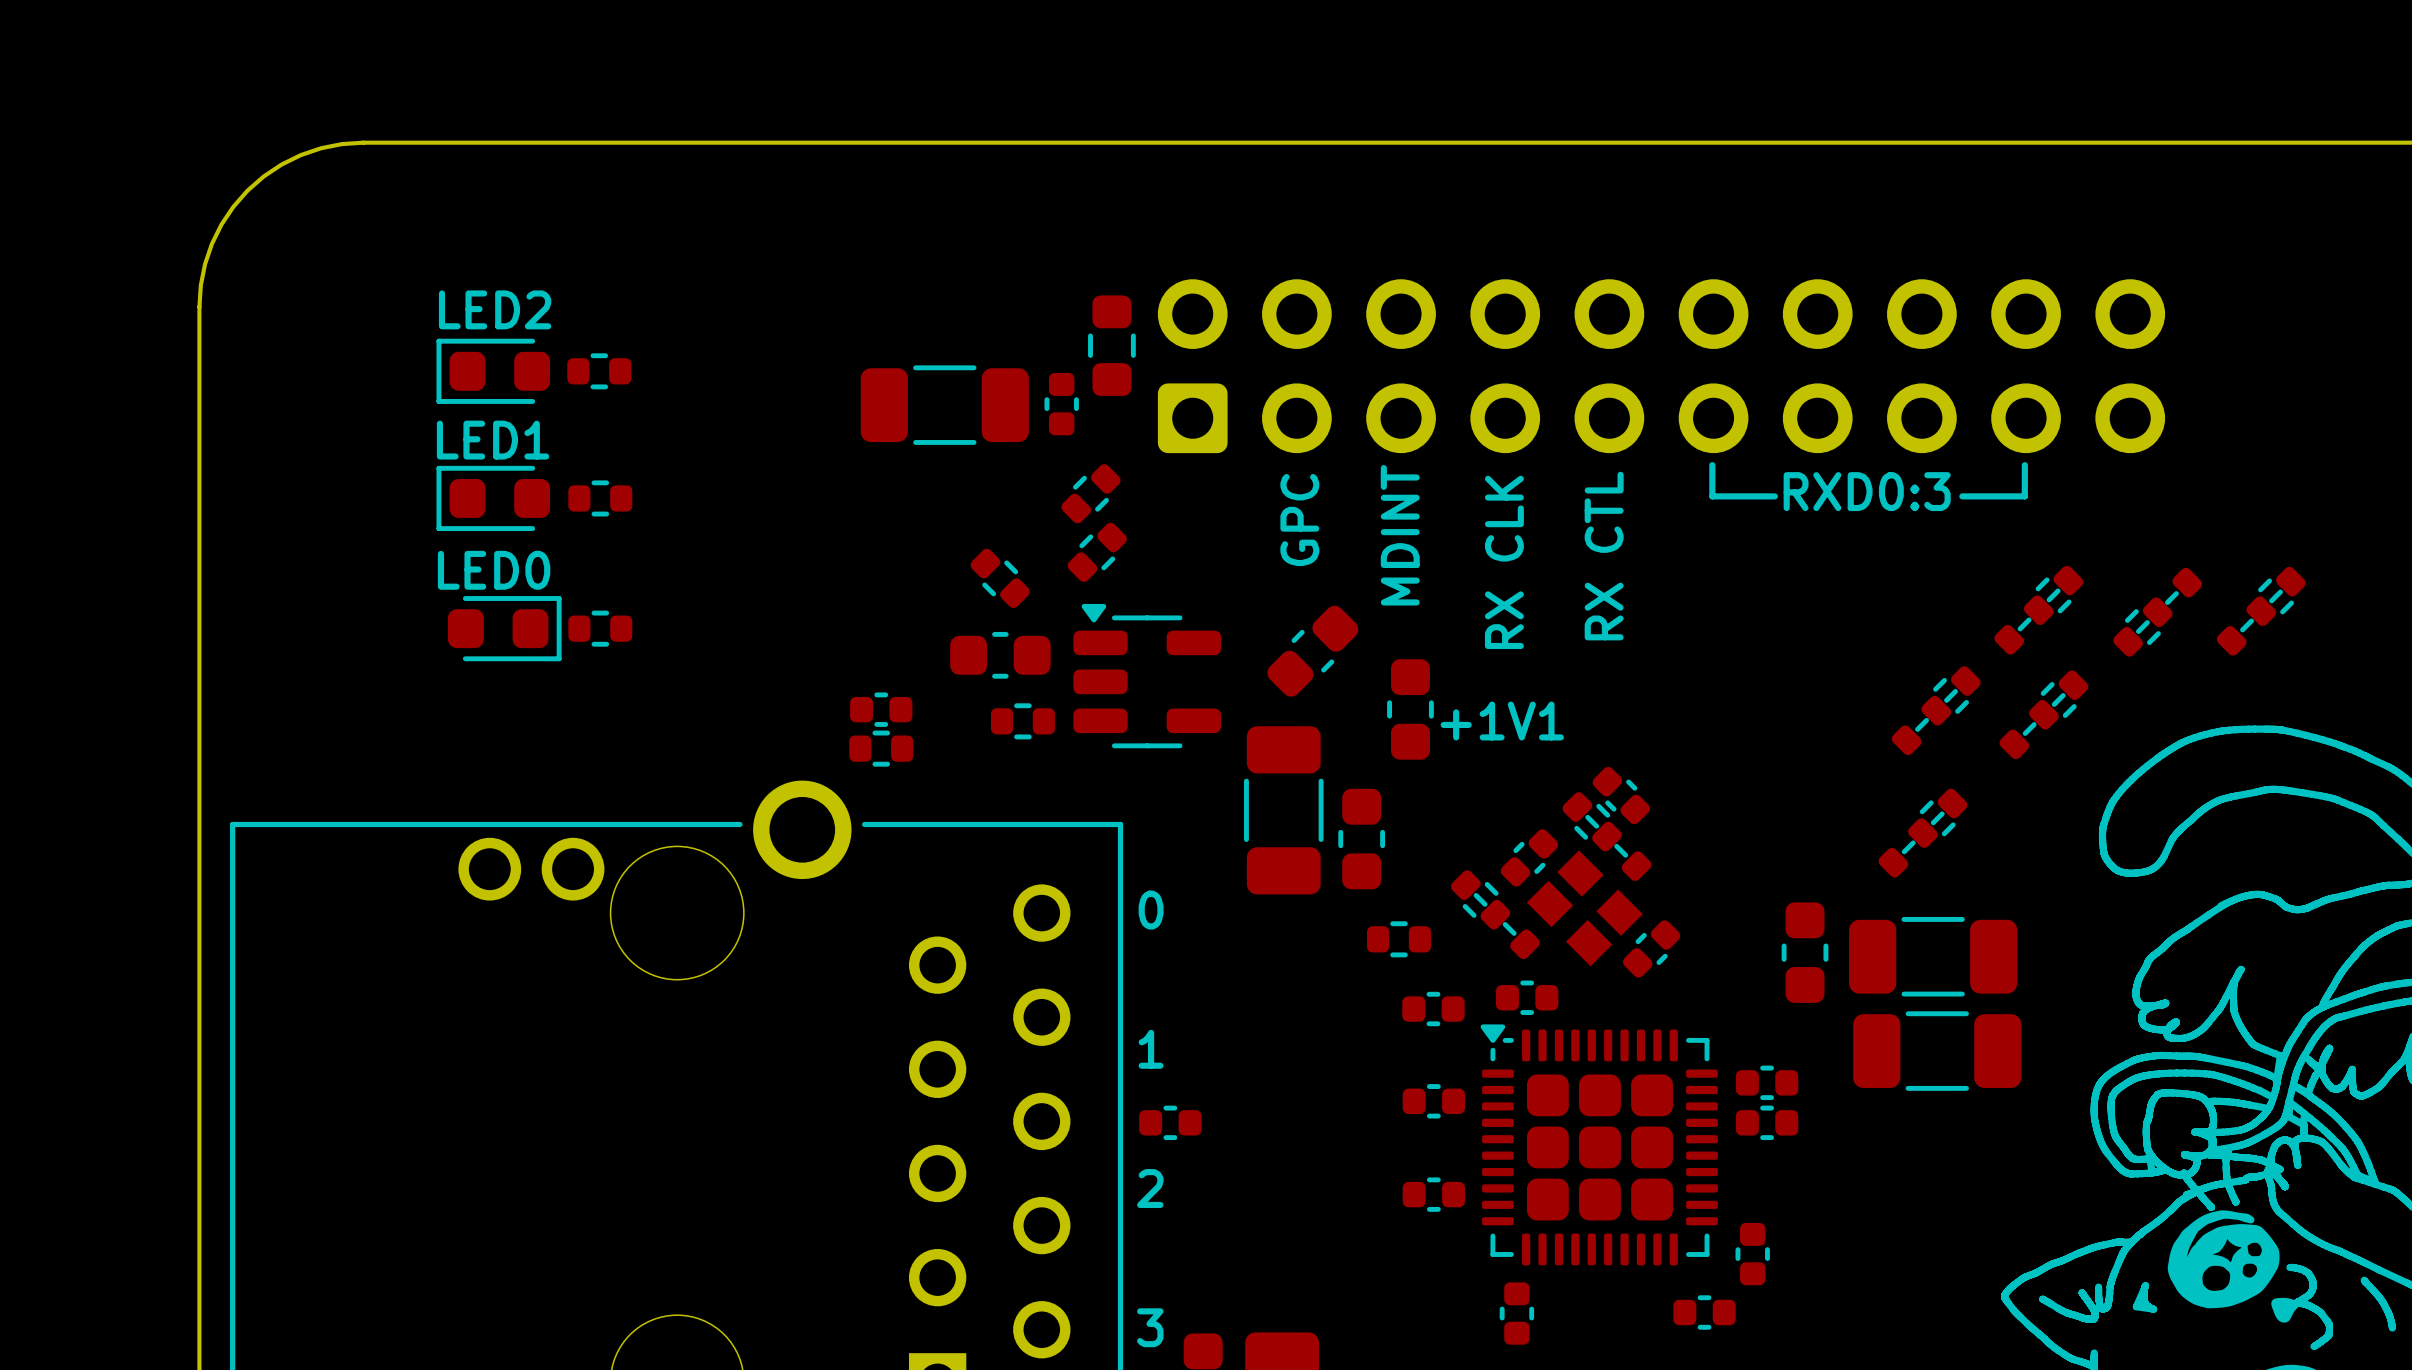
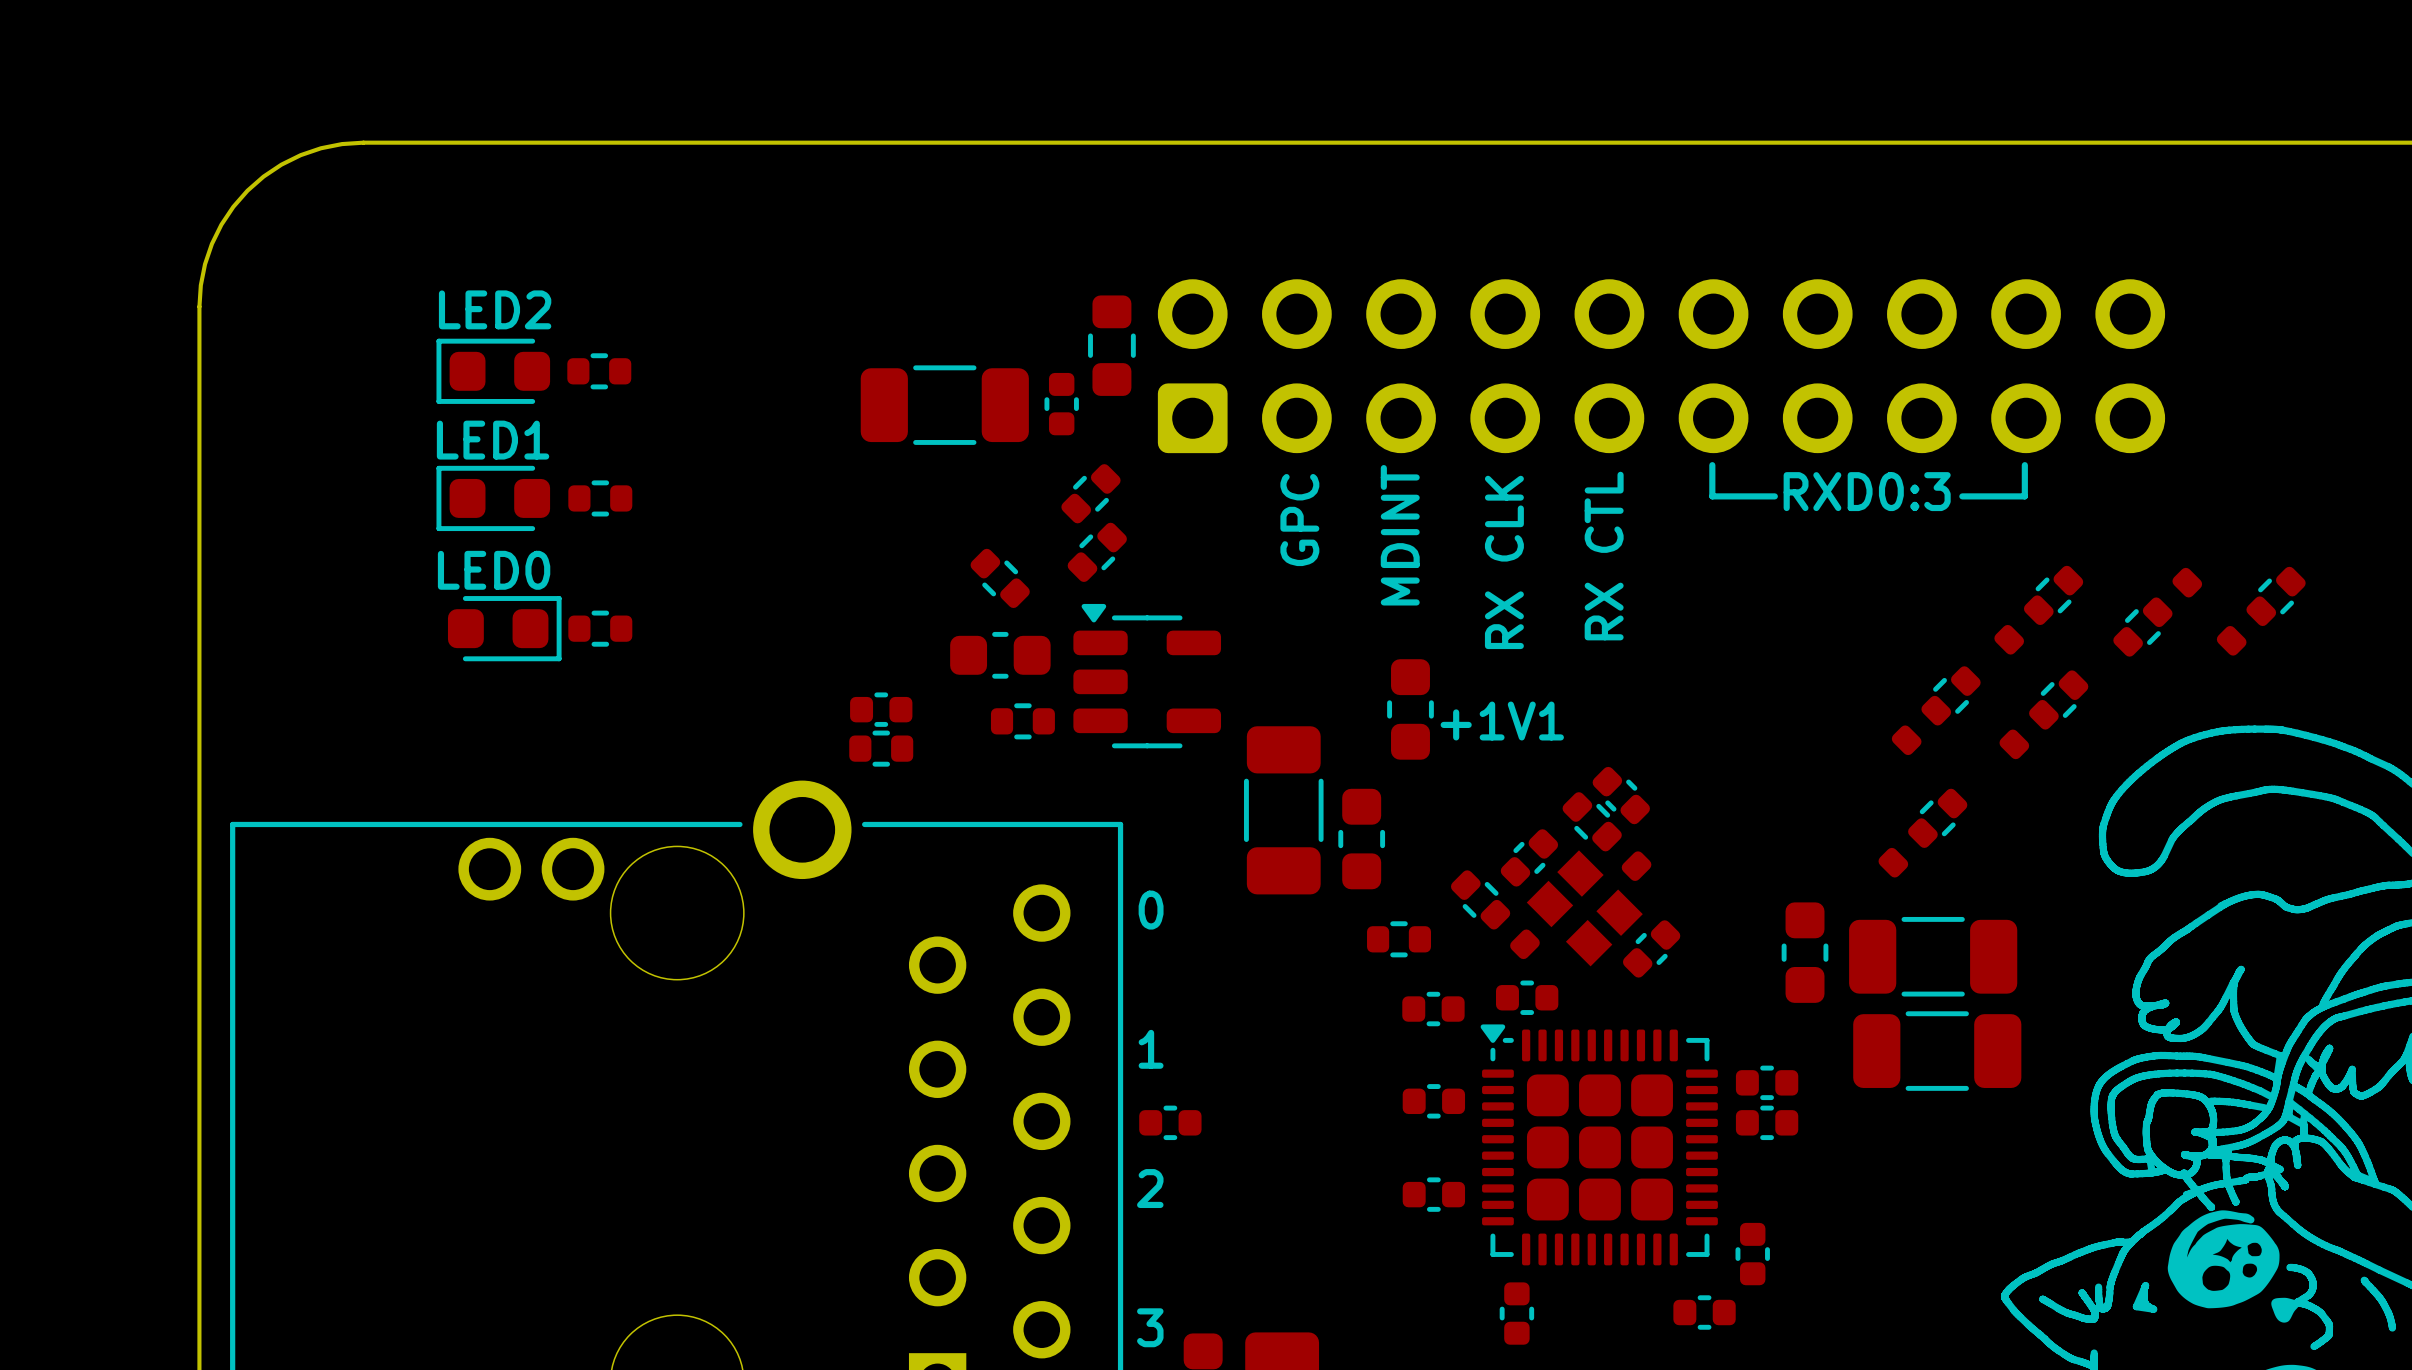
part footprint: [1994, 565, 2084, 655] -> [1994, 565, 2084, 655]
part footprint: [2216, 566, 2306, 656] -> [2216, 566, 2306, 656]
part footprint: [2113, 567, 2203, 657] -> [2113, 567, 2203, 657]
part: (1312, 651) -> none
part footprint: [1891, 666, 1981, 756] -> [1891, 666, 1981, 756]
part footprint: [1999, 670, 2089, 760] -> [1999, 670, 2089, 760]
part footprint: [1878, 788, 1968, 878] -> [1878, 788, 1968, 878]
part footprint: [1562, 792, 1652, 881] -> [1562, 792, 1652, 881]
part footprint: [1450, 870, 1540, 960] -> [1450, 870, 1540, 960]

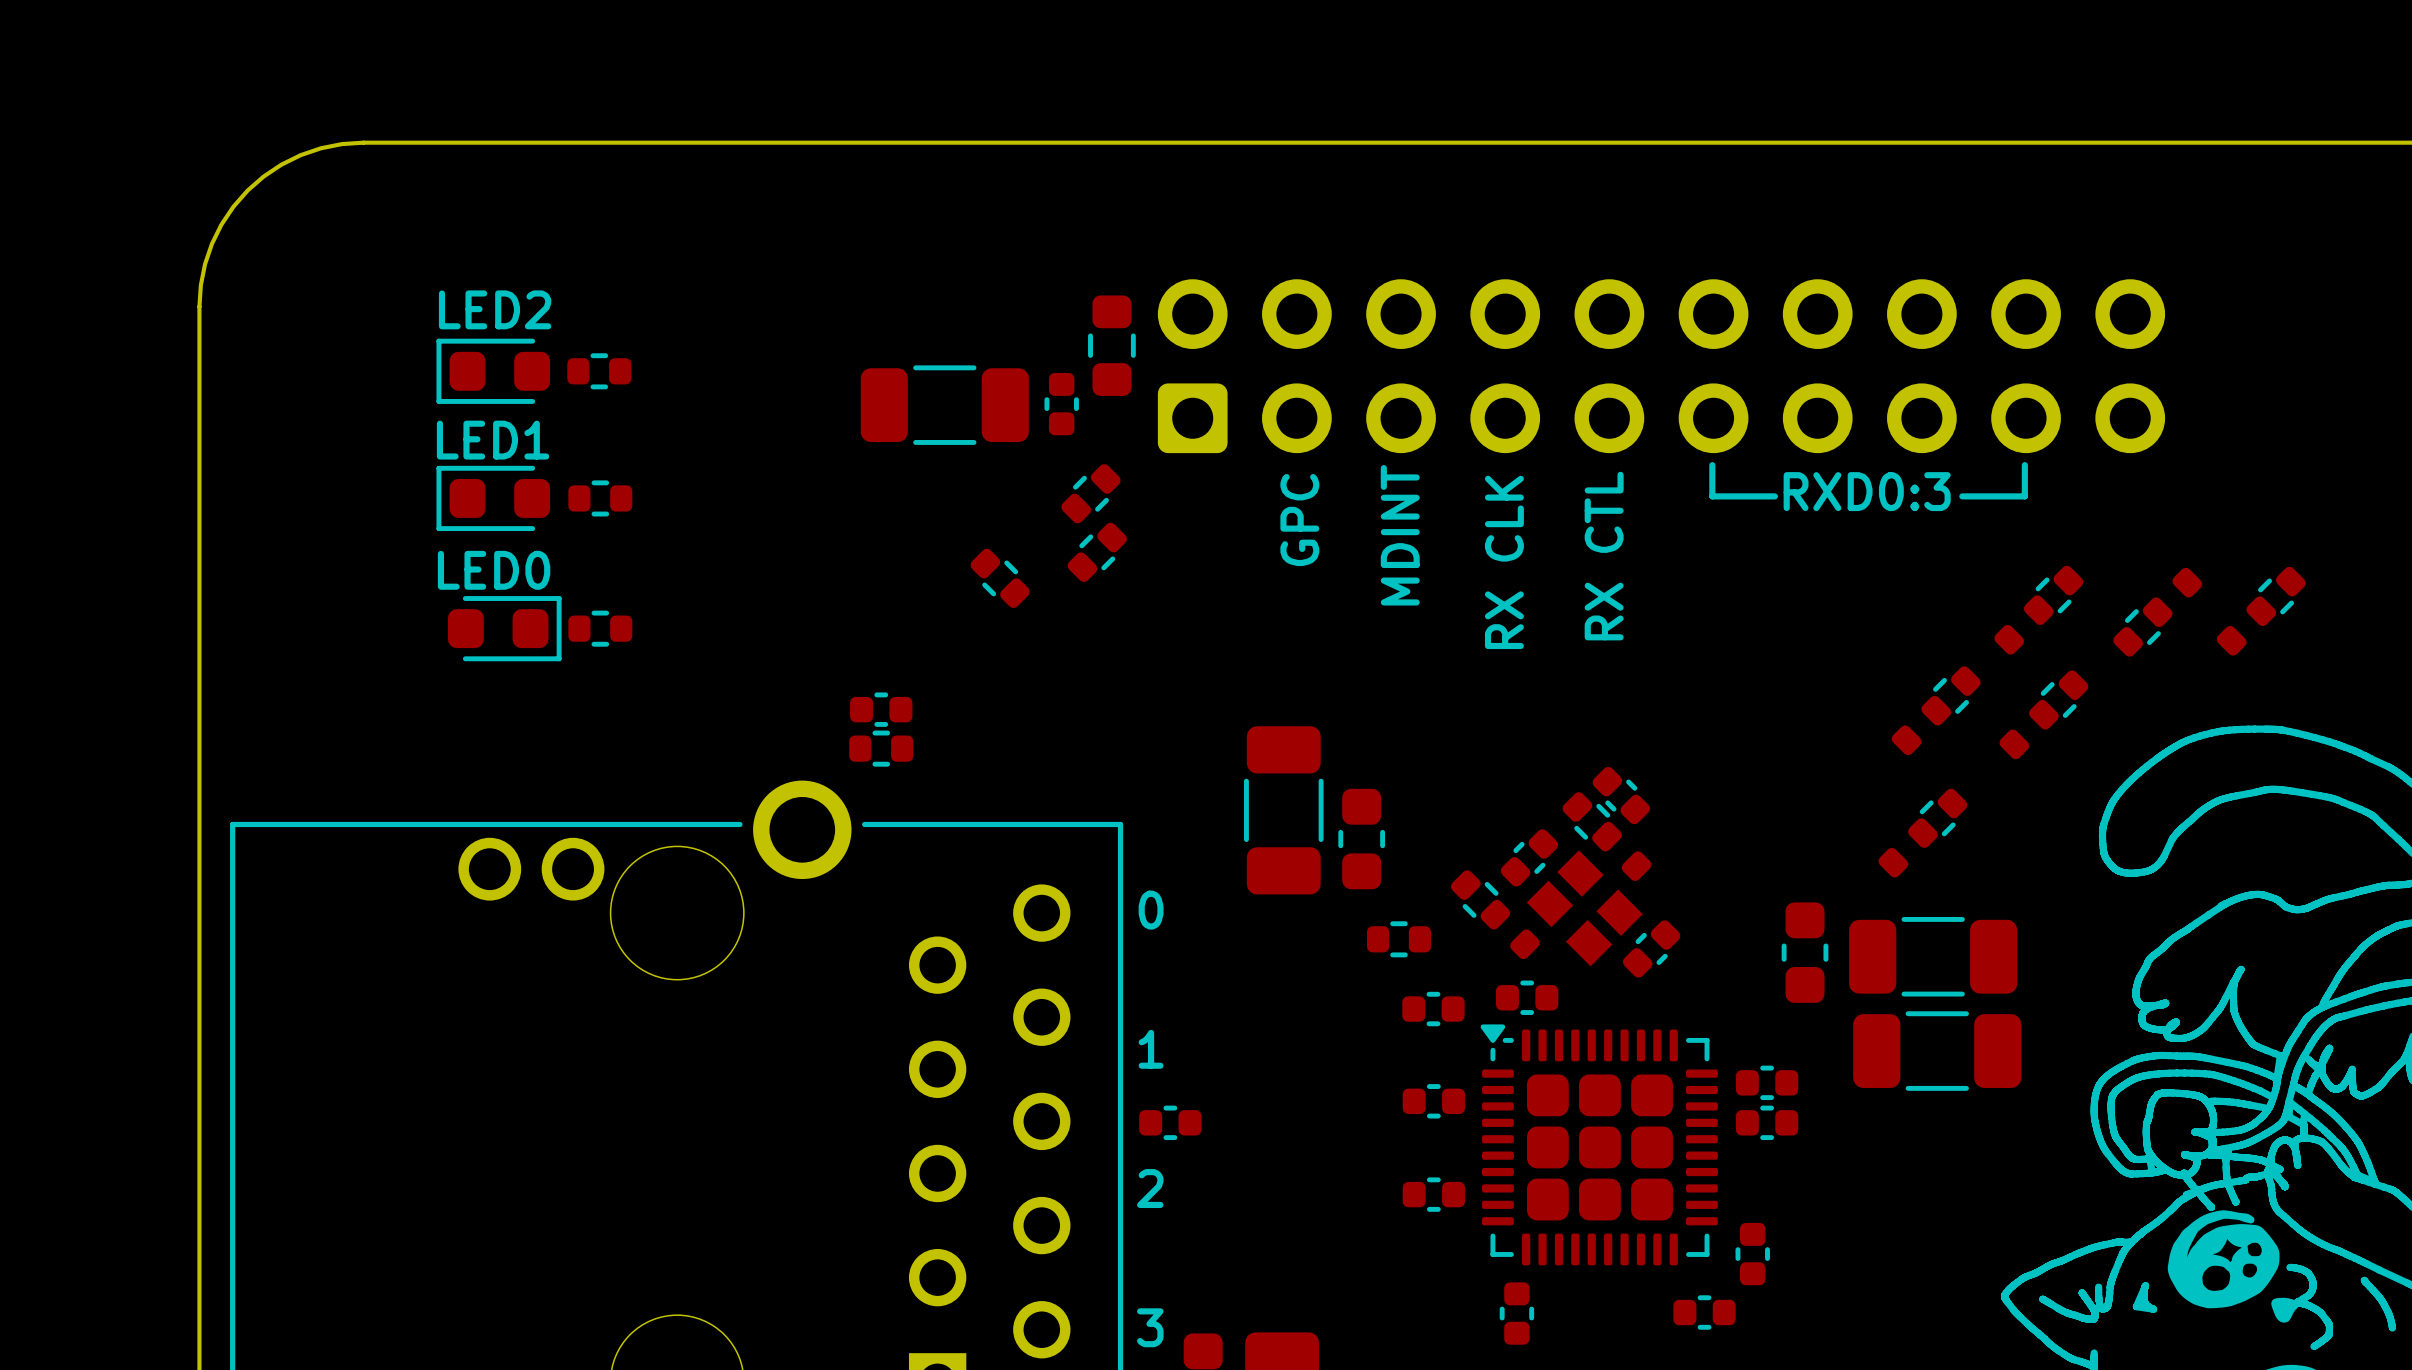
part: (1000, 655) -> none
part: (1147, 676) -> none
part: (1410, 709) -> none
part: (1022, 721) -> none
text: +1V1 (1502, 721) -> none

